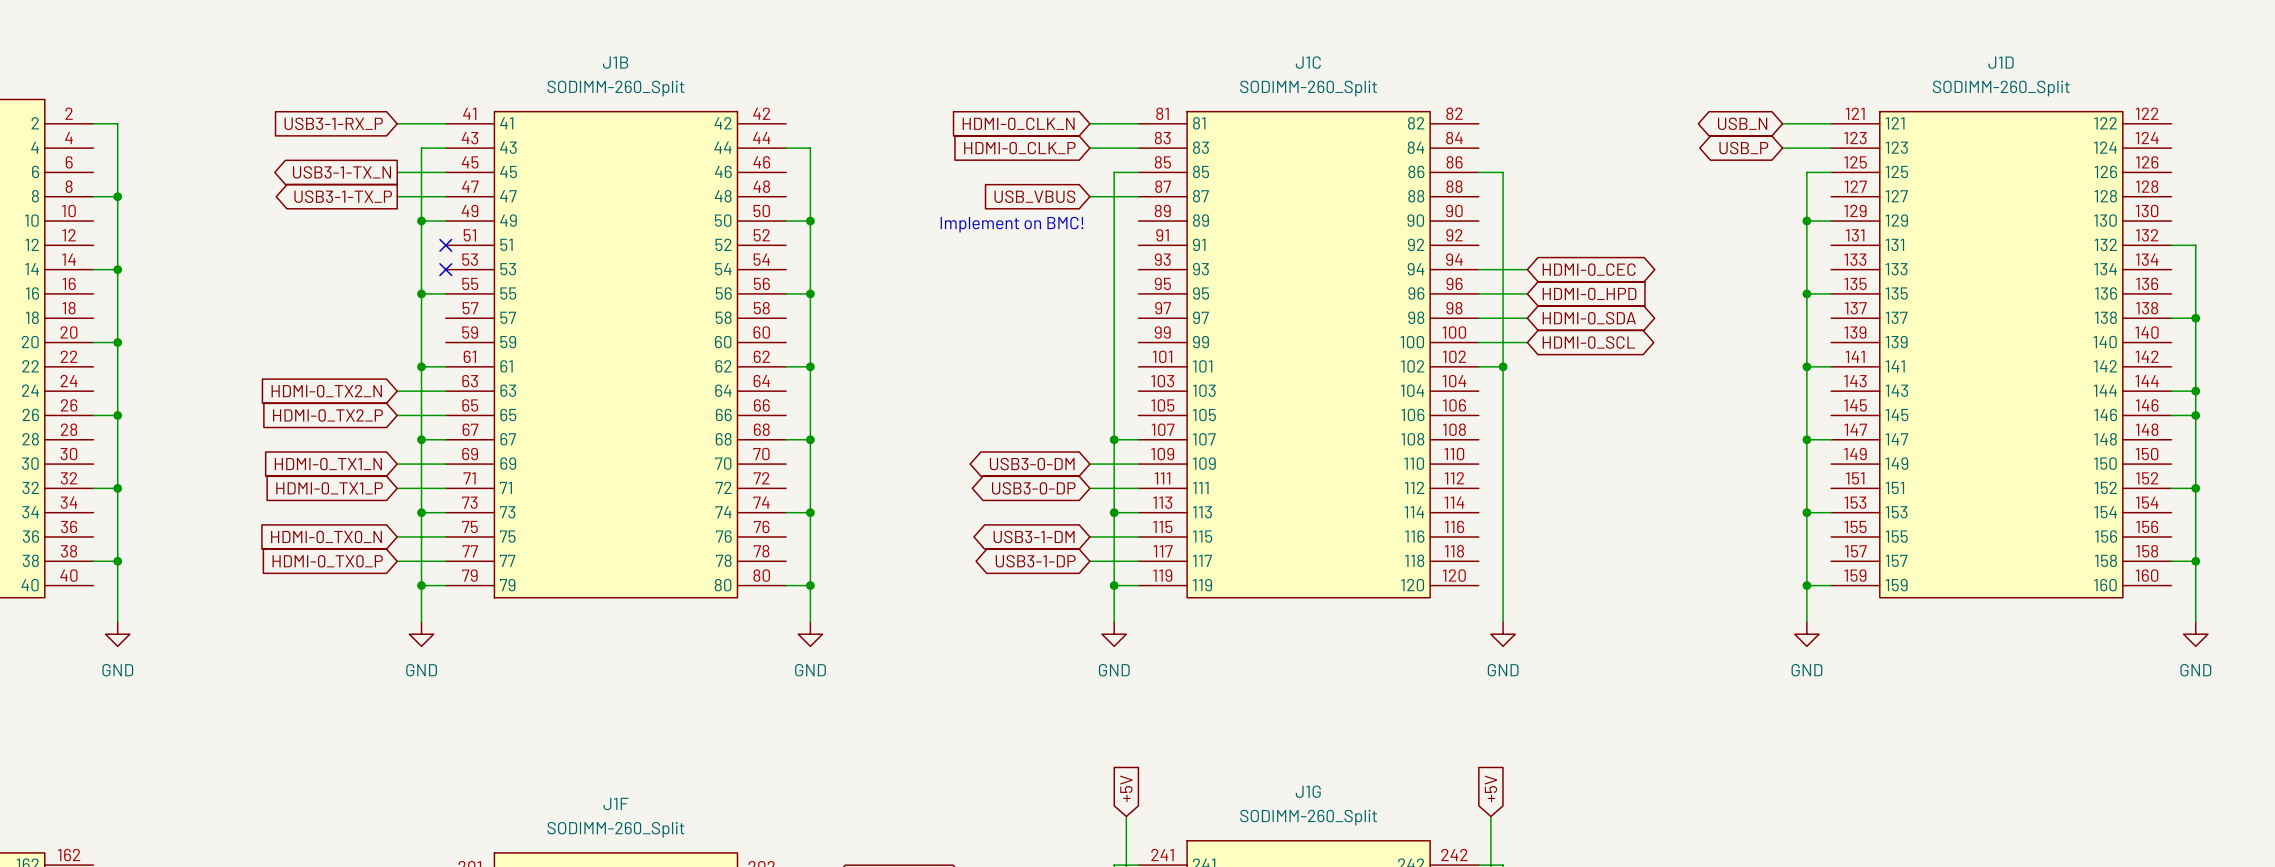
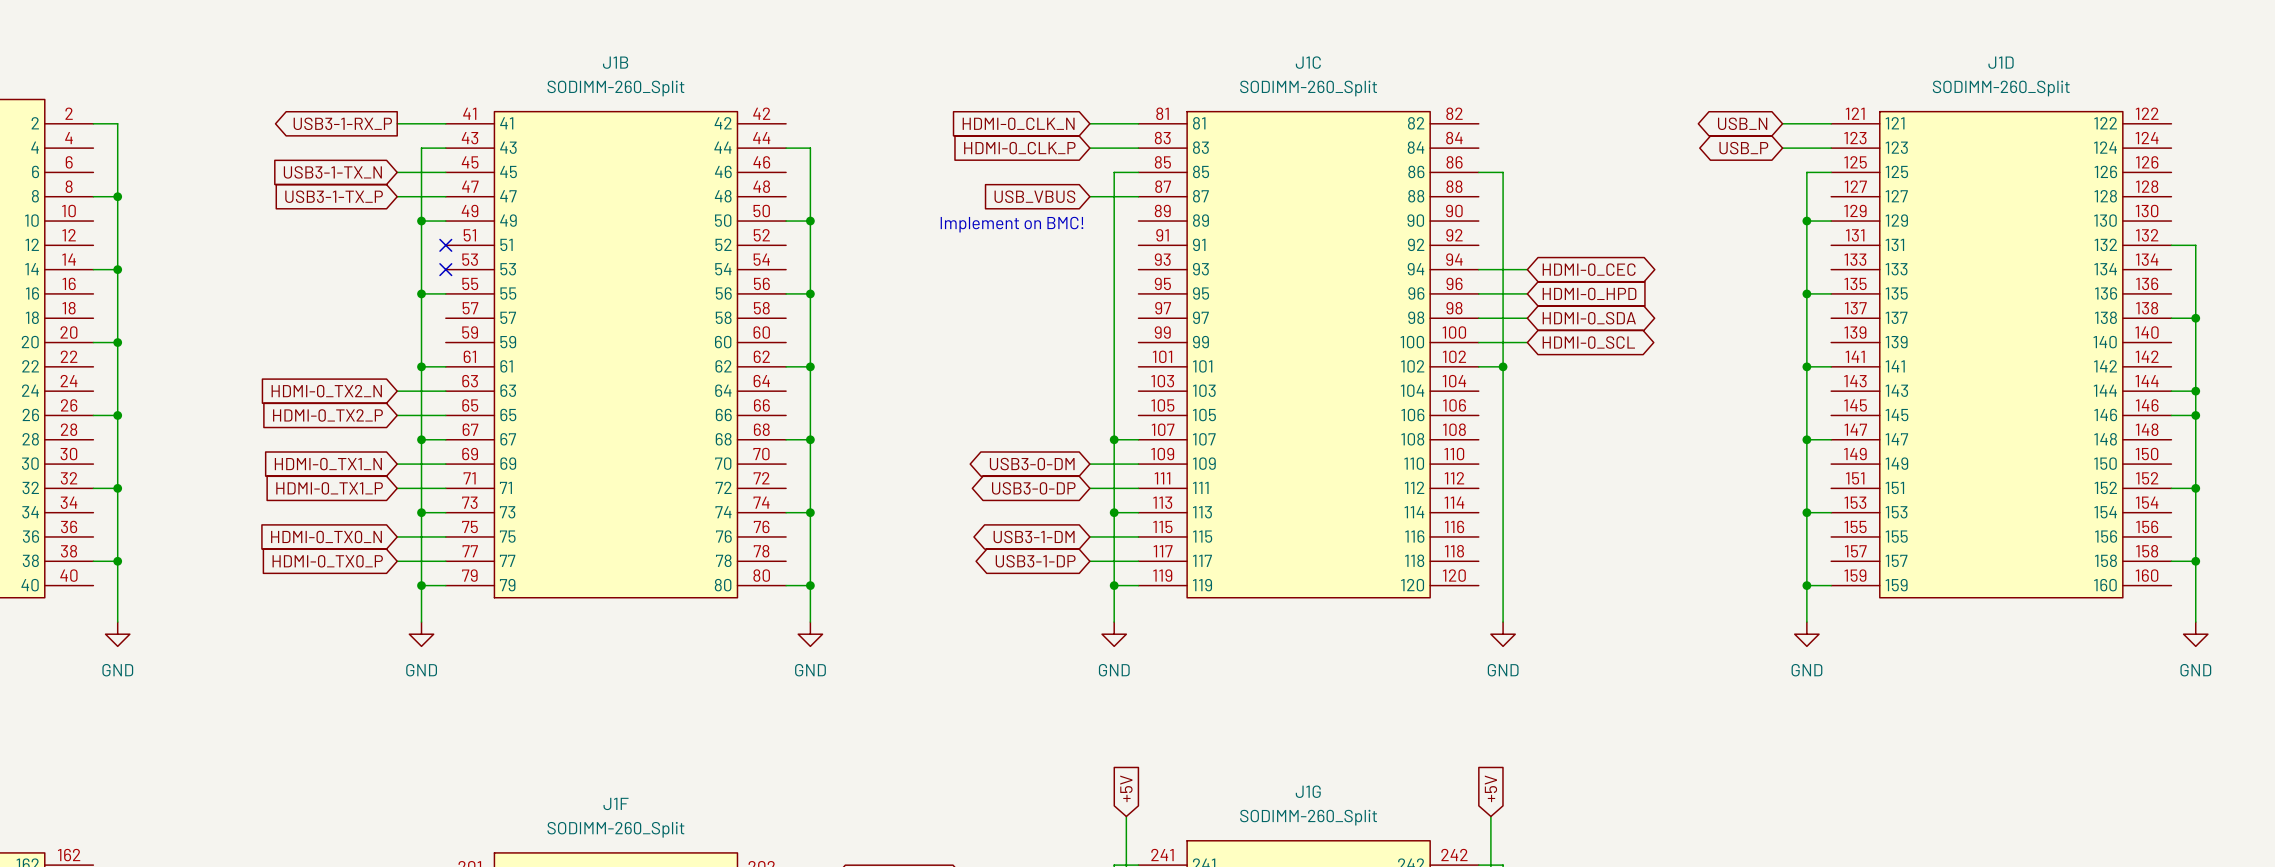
global label shape: input (333, 123) -> output (342, 123)
global label shape: output (341, 172) -> input (332, 172)
global label shape: output (343, 196) -> input (334, 196)

